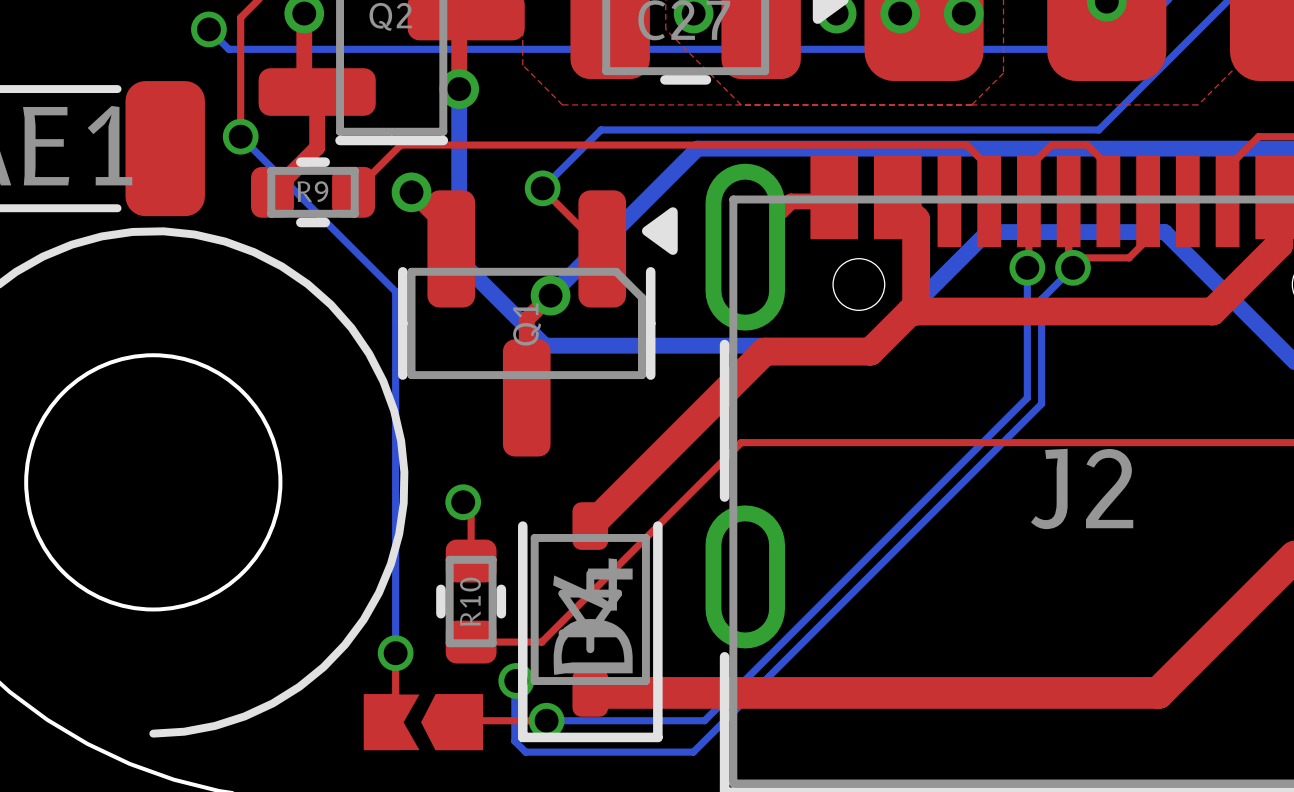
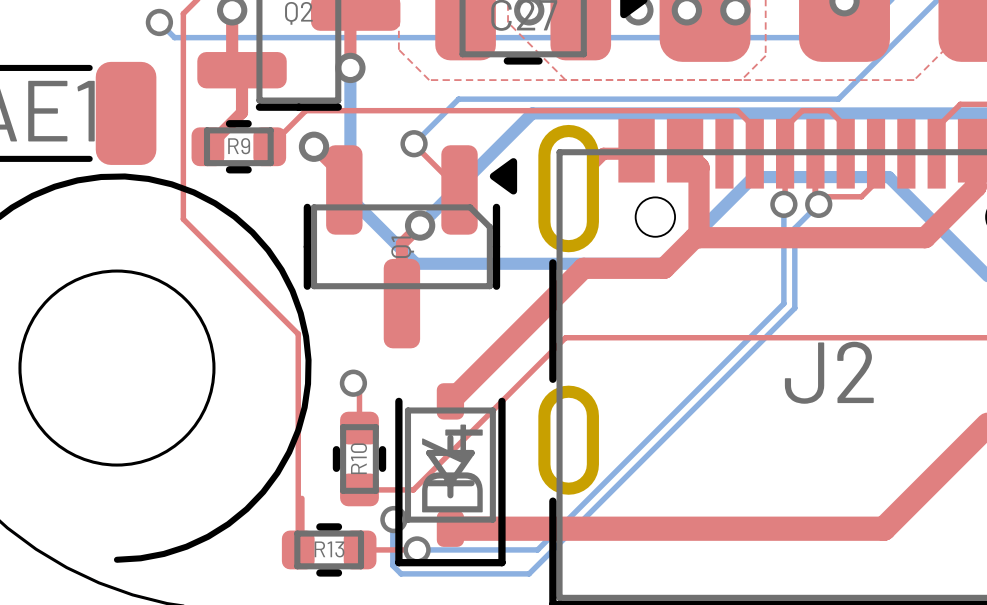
top track: (240, 17) (240, 136) -> (183, 13) (183, 219) (298, 334) (298, 549)
bottom track: (240, 136) (395, 291) (395, 653) -> none
via: (240, 136) -> none
via: (395, 653) -> none
R13: none -> (329, 549)
part: (423, 722) -> none

